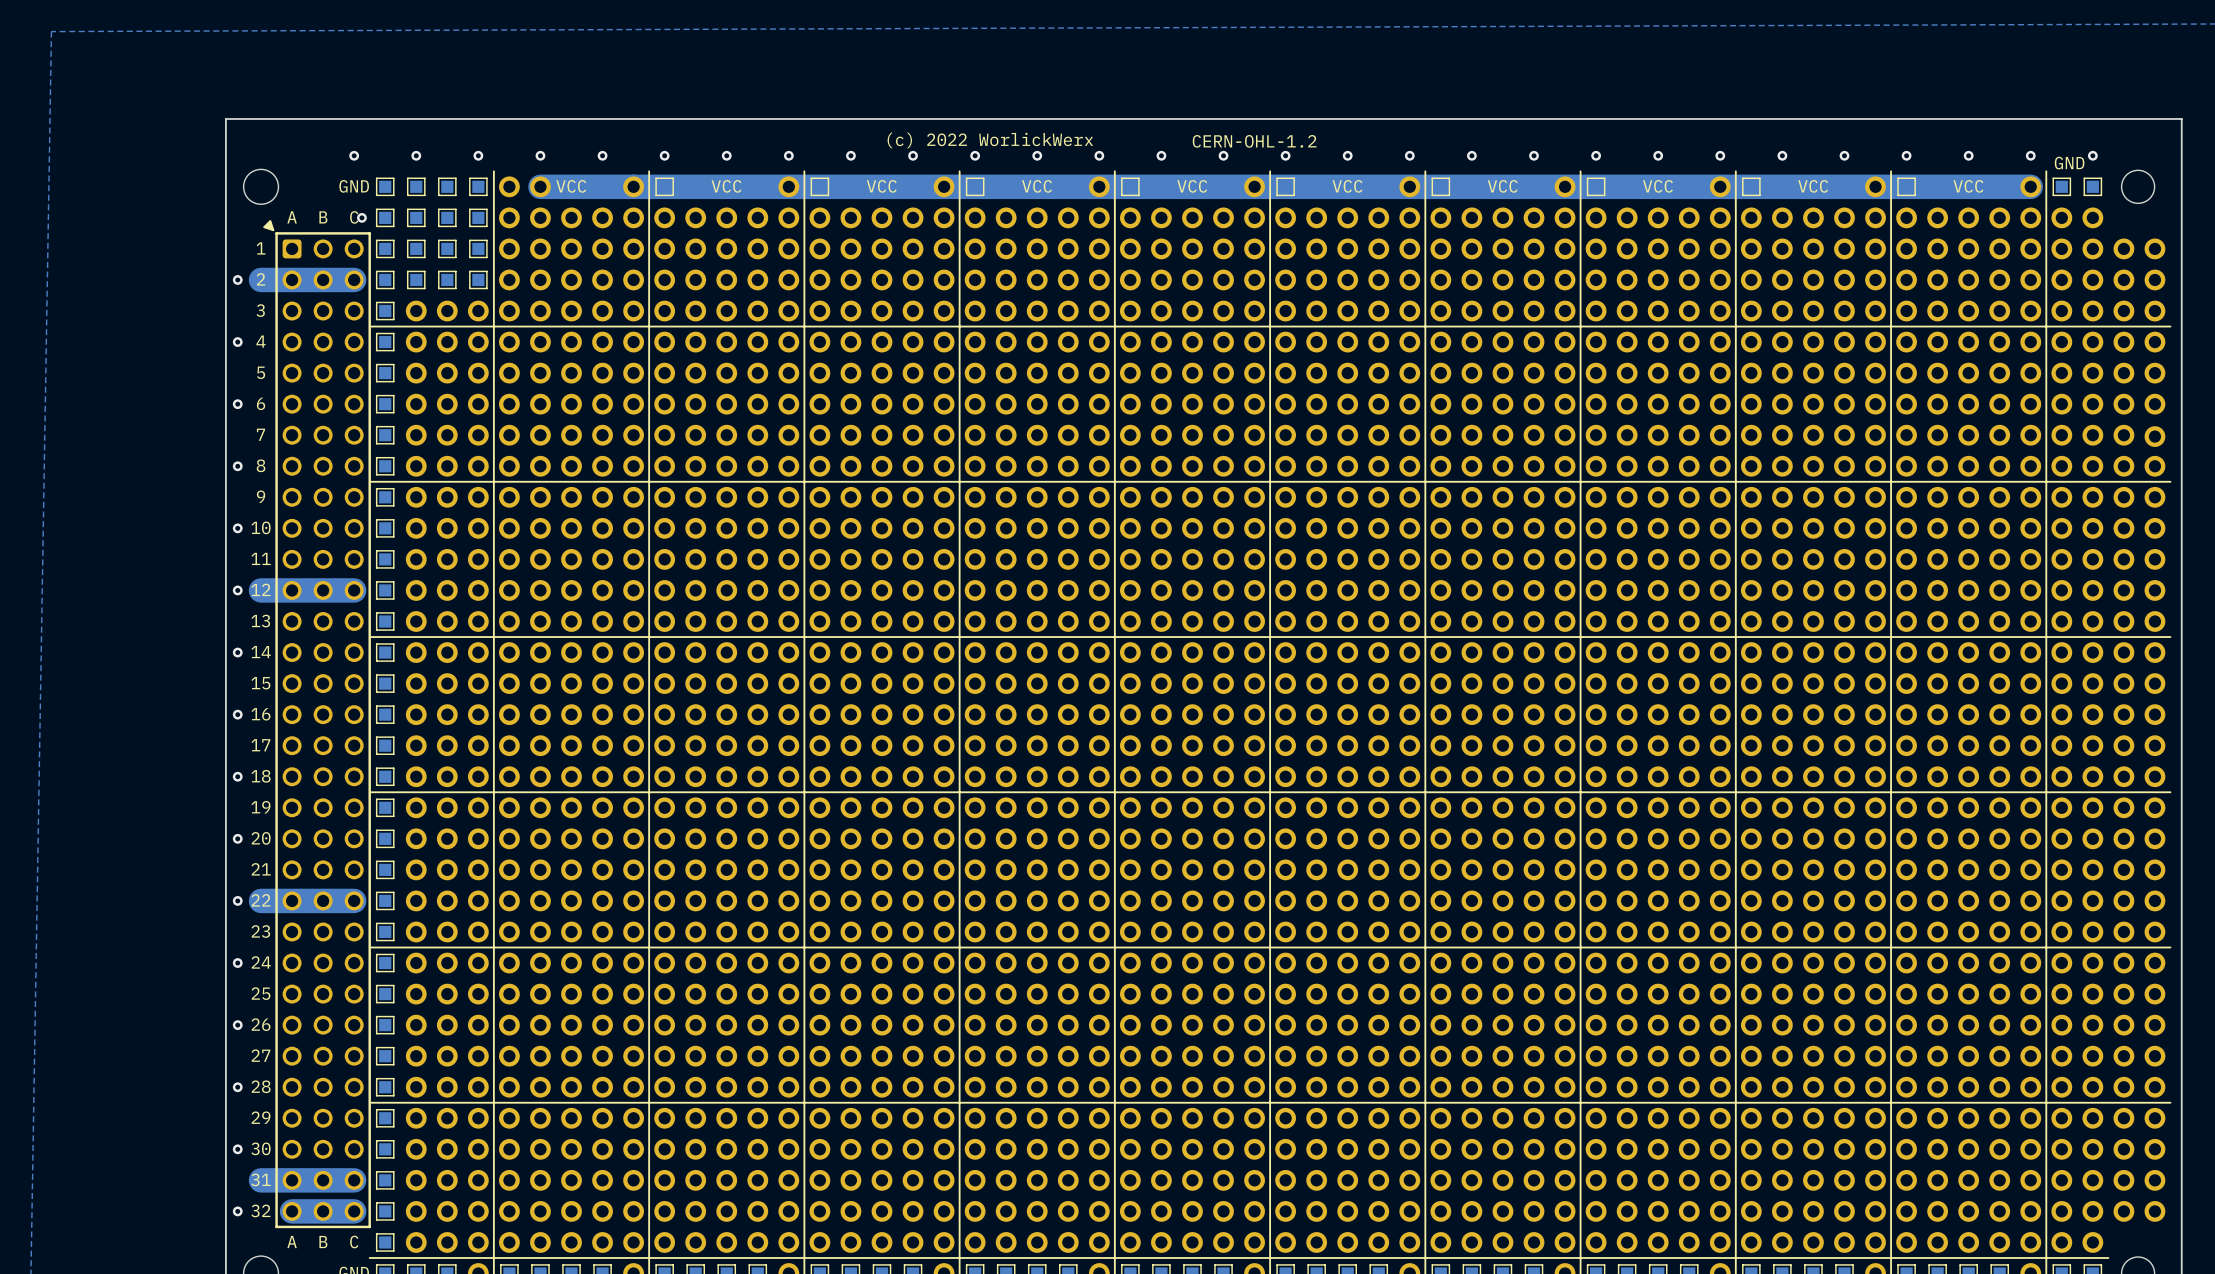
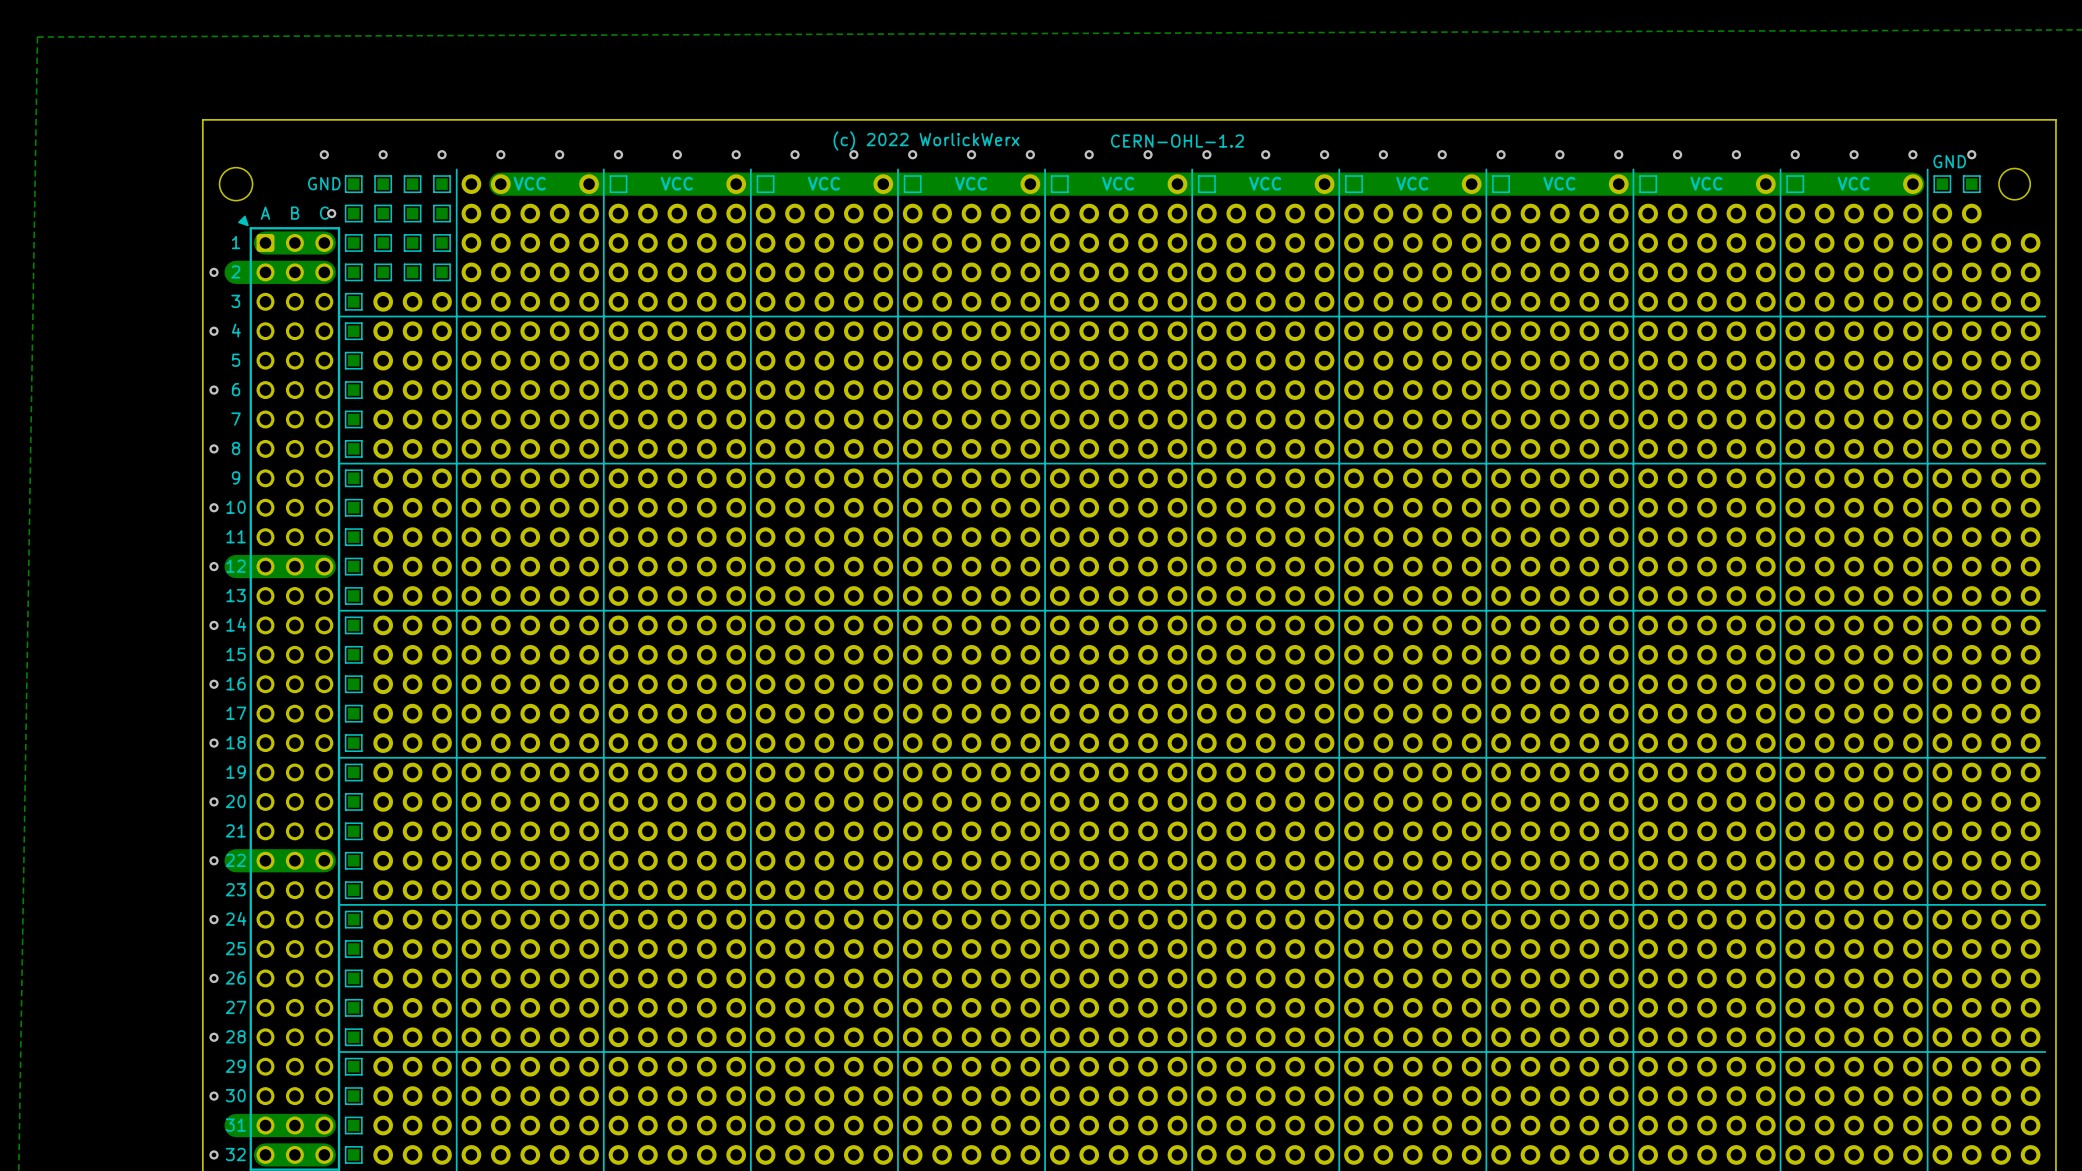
track: none -> (324, 242) (265, 242)

